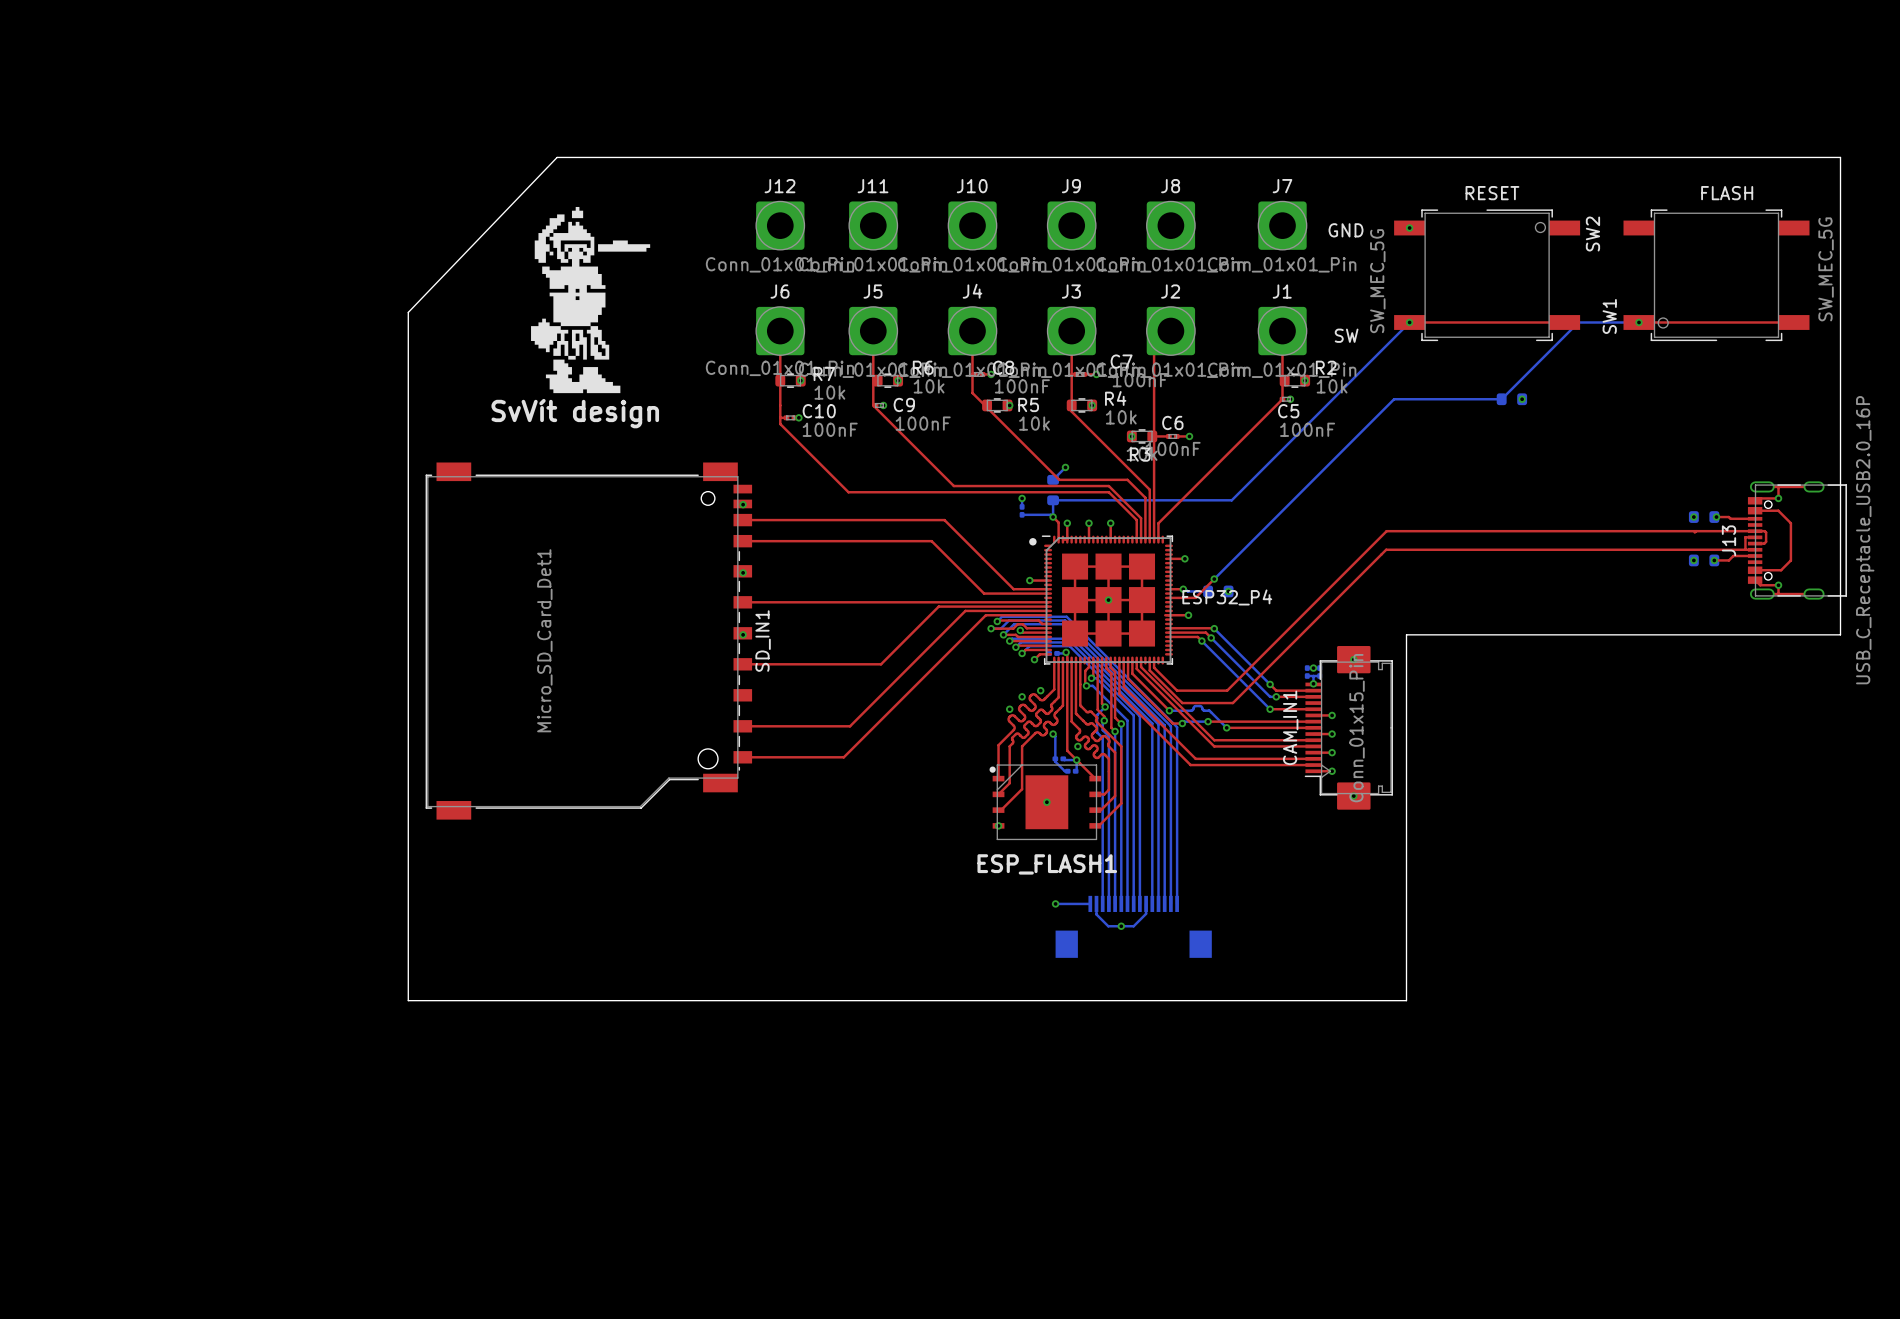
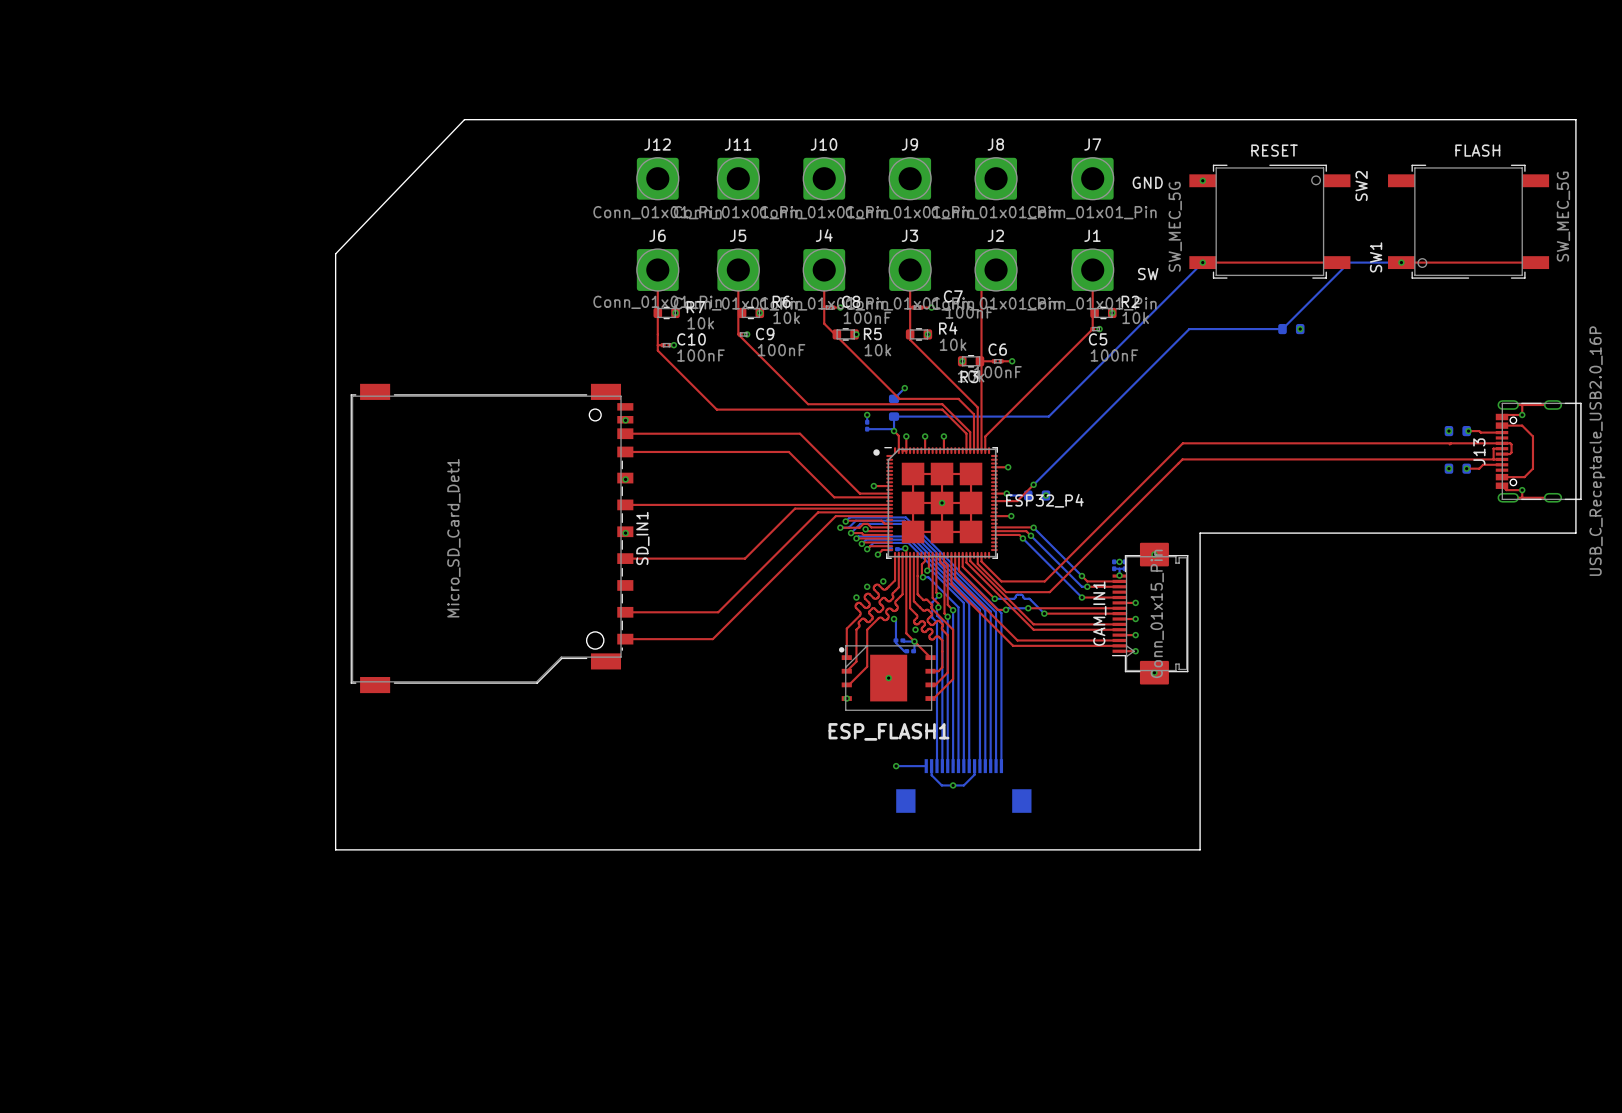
SvVít design: (590, 300) -> none

